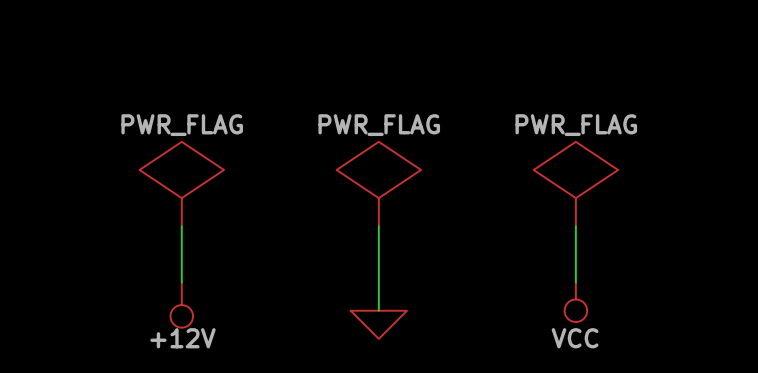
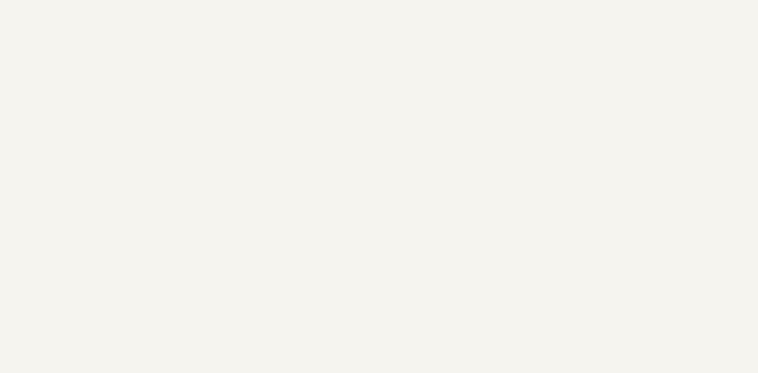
power symbol: PWR_FLAG (181, 184) -> none
power symbol: PWR_FLAG (378, 184) -> none
power symbol: PWR_FLAG (575, 184) -> none
wire: (181, 226) (181, 282) -> none
wire: (378, 226) (378, 310) -> none
wire: (575, 226) (575, 282) -> none
power symbol: VCC (575, 302) -> none
power symbol: +12V (181, 305) -> none
power symbol: (378, 324) -> none

